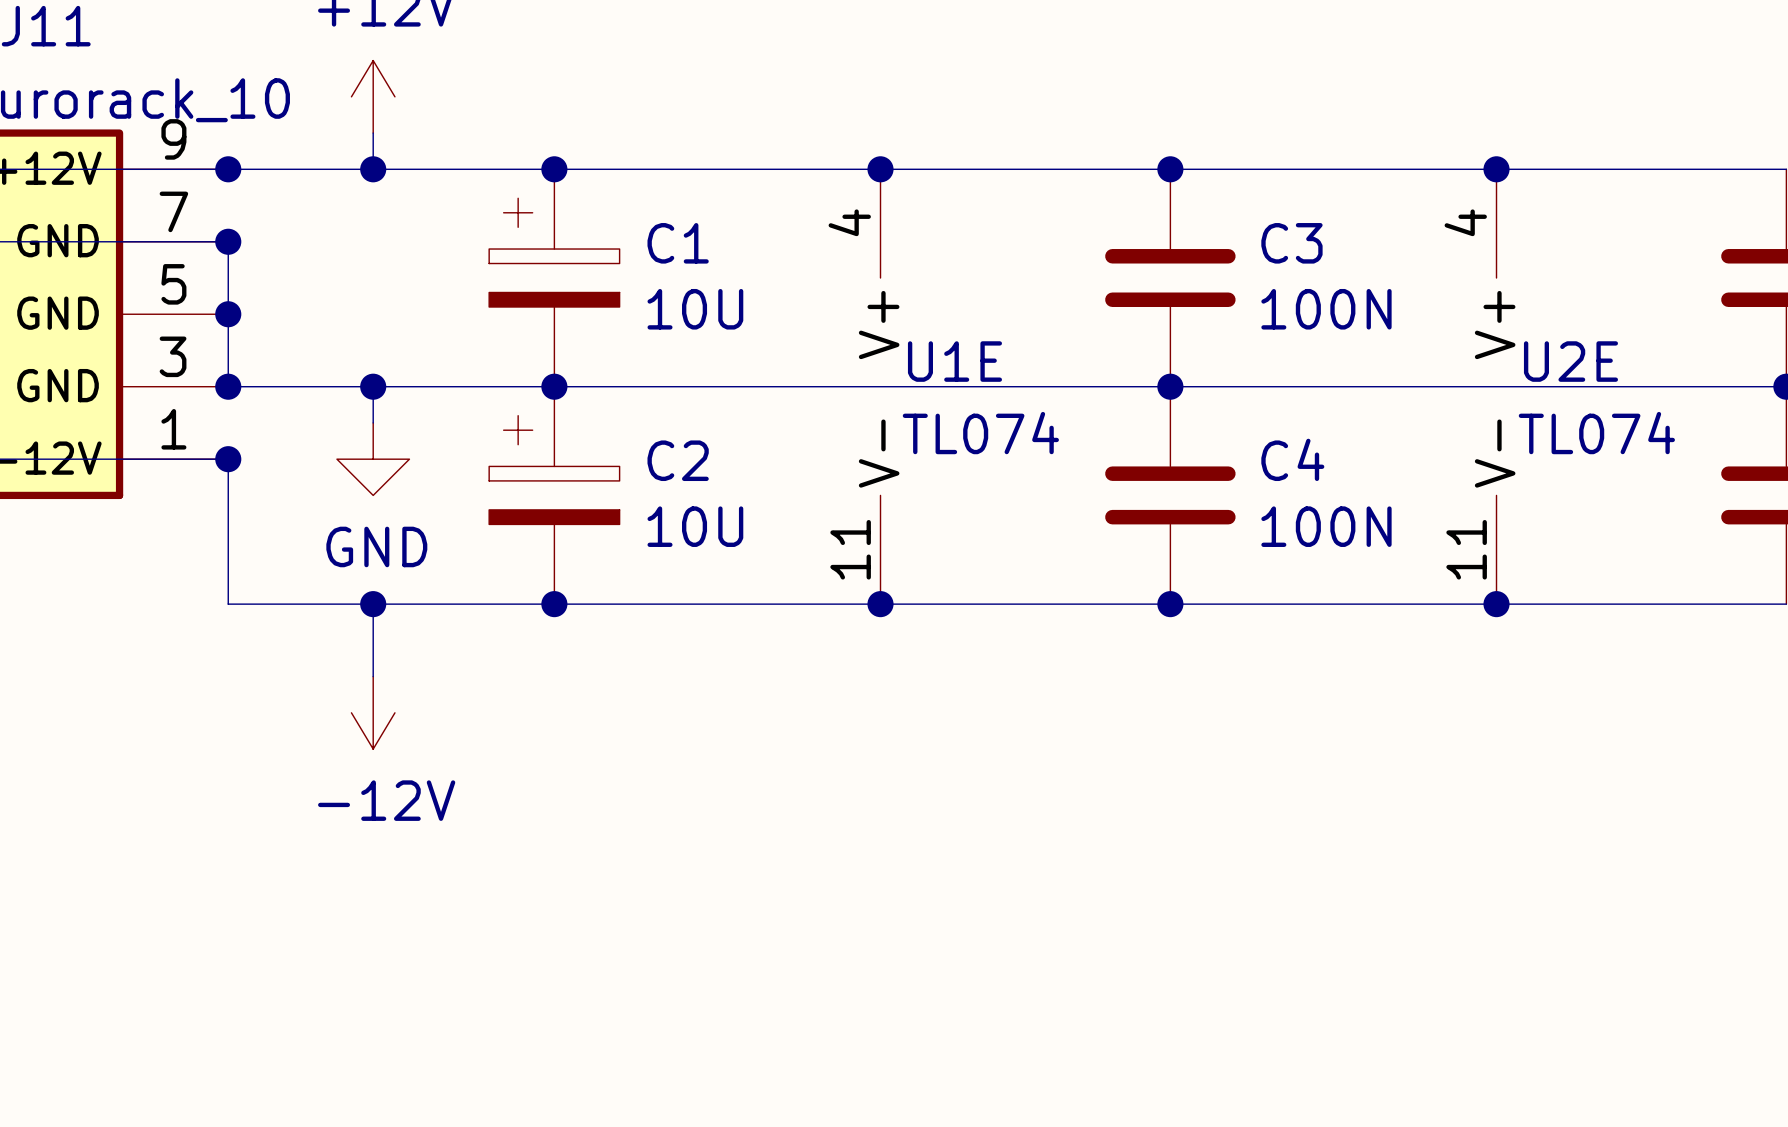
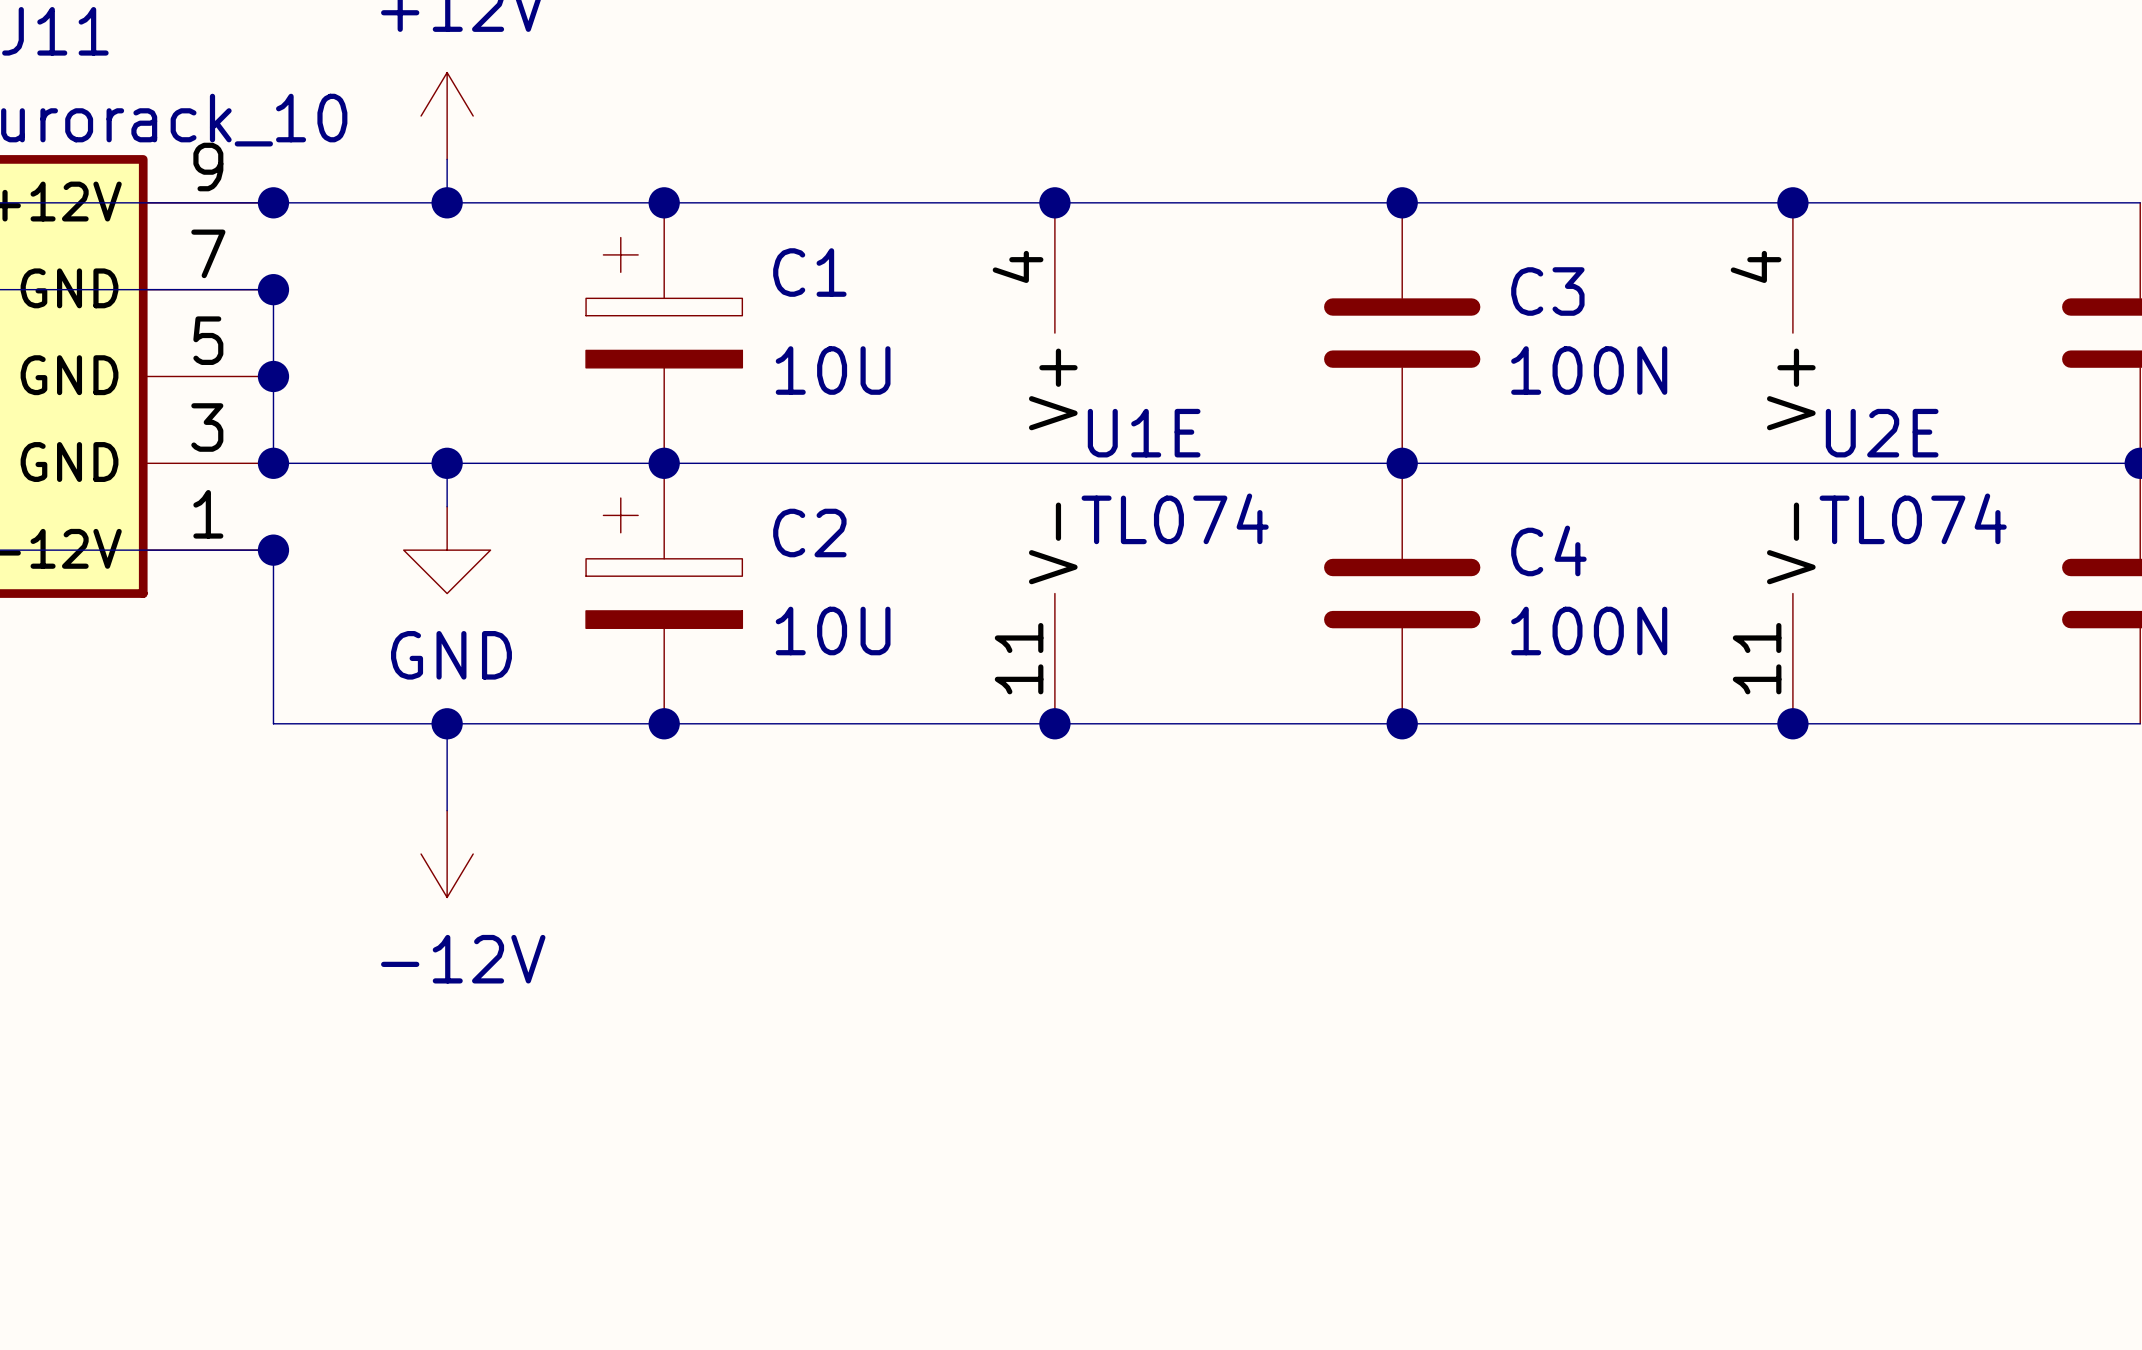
C1 name position: C1 (678, 243) -> C1 (809, 272)
C2 name position: C2 (678, 460) -> C2 (809, 533)

